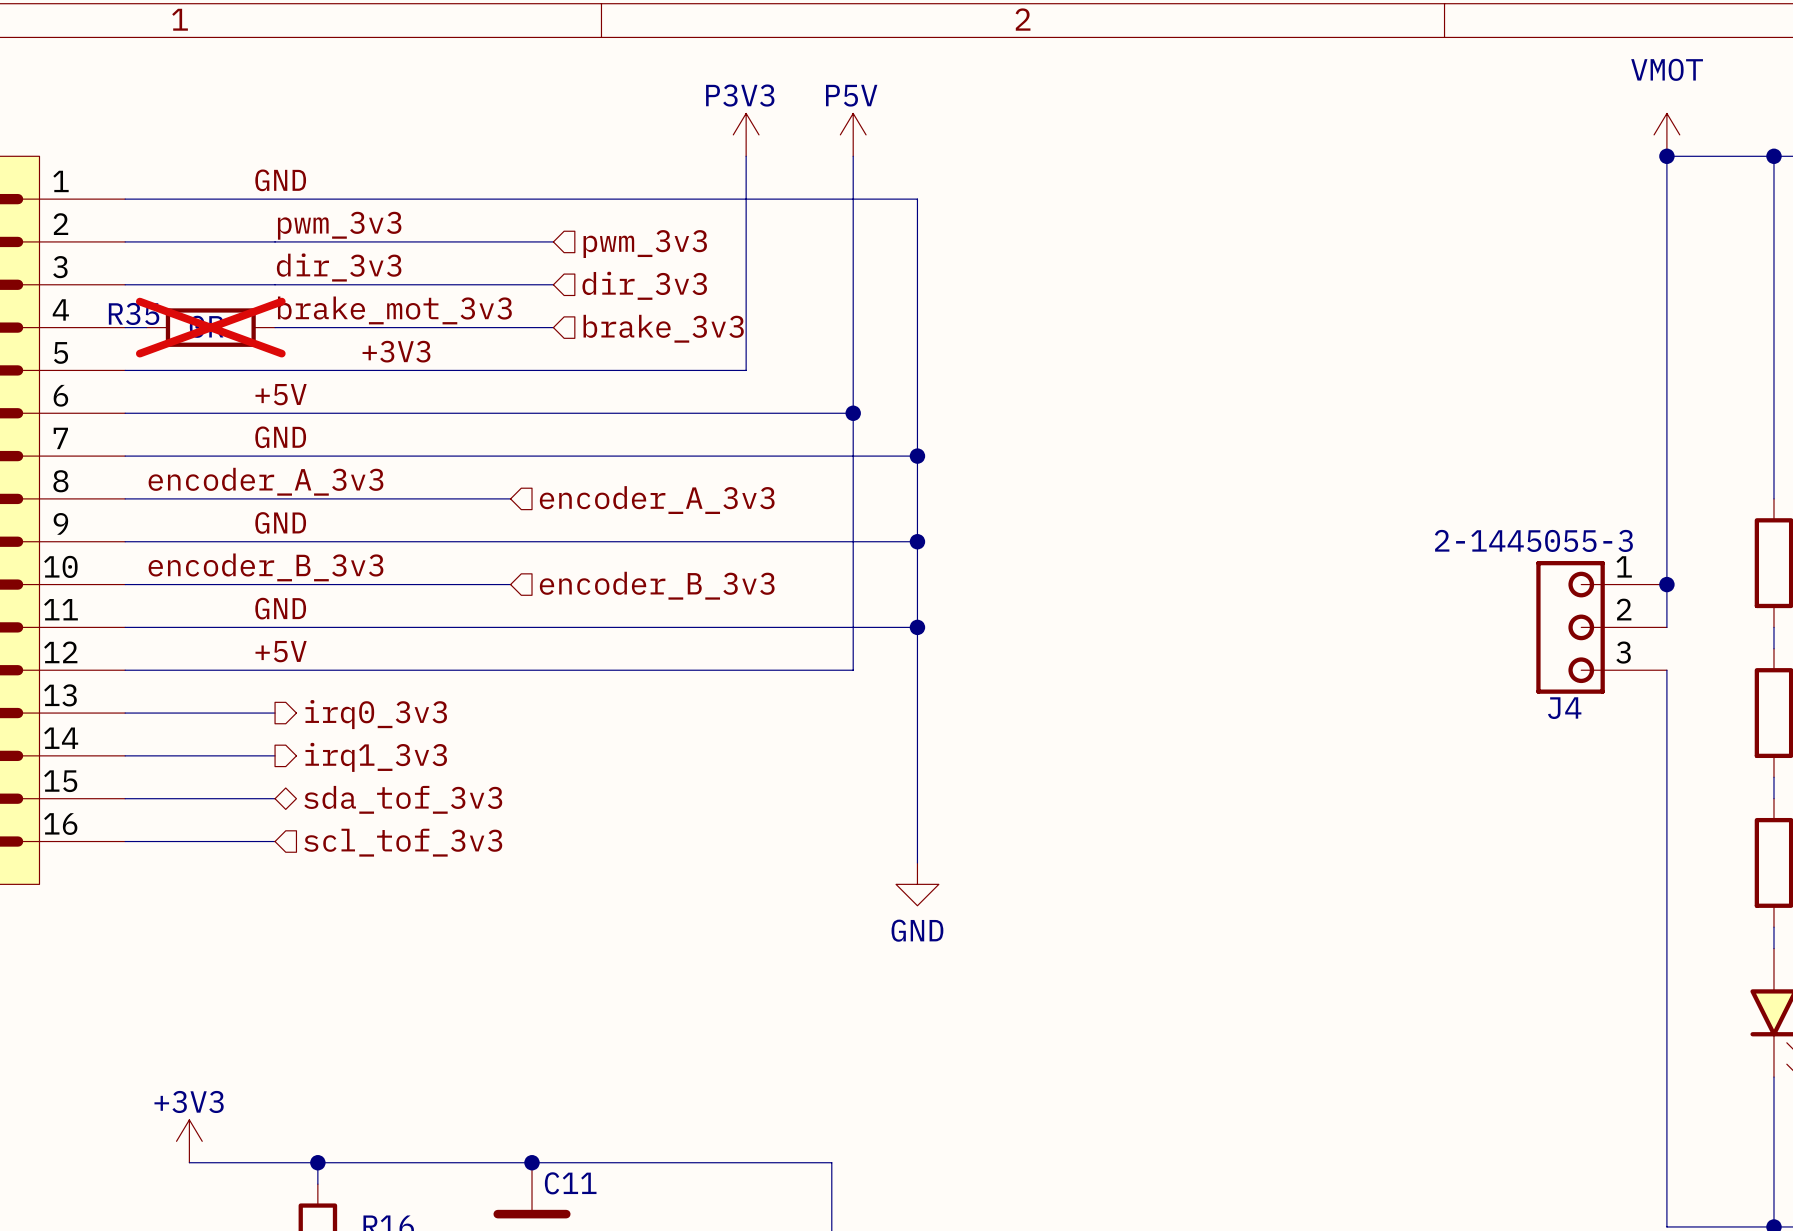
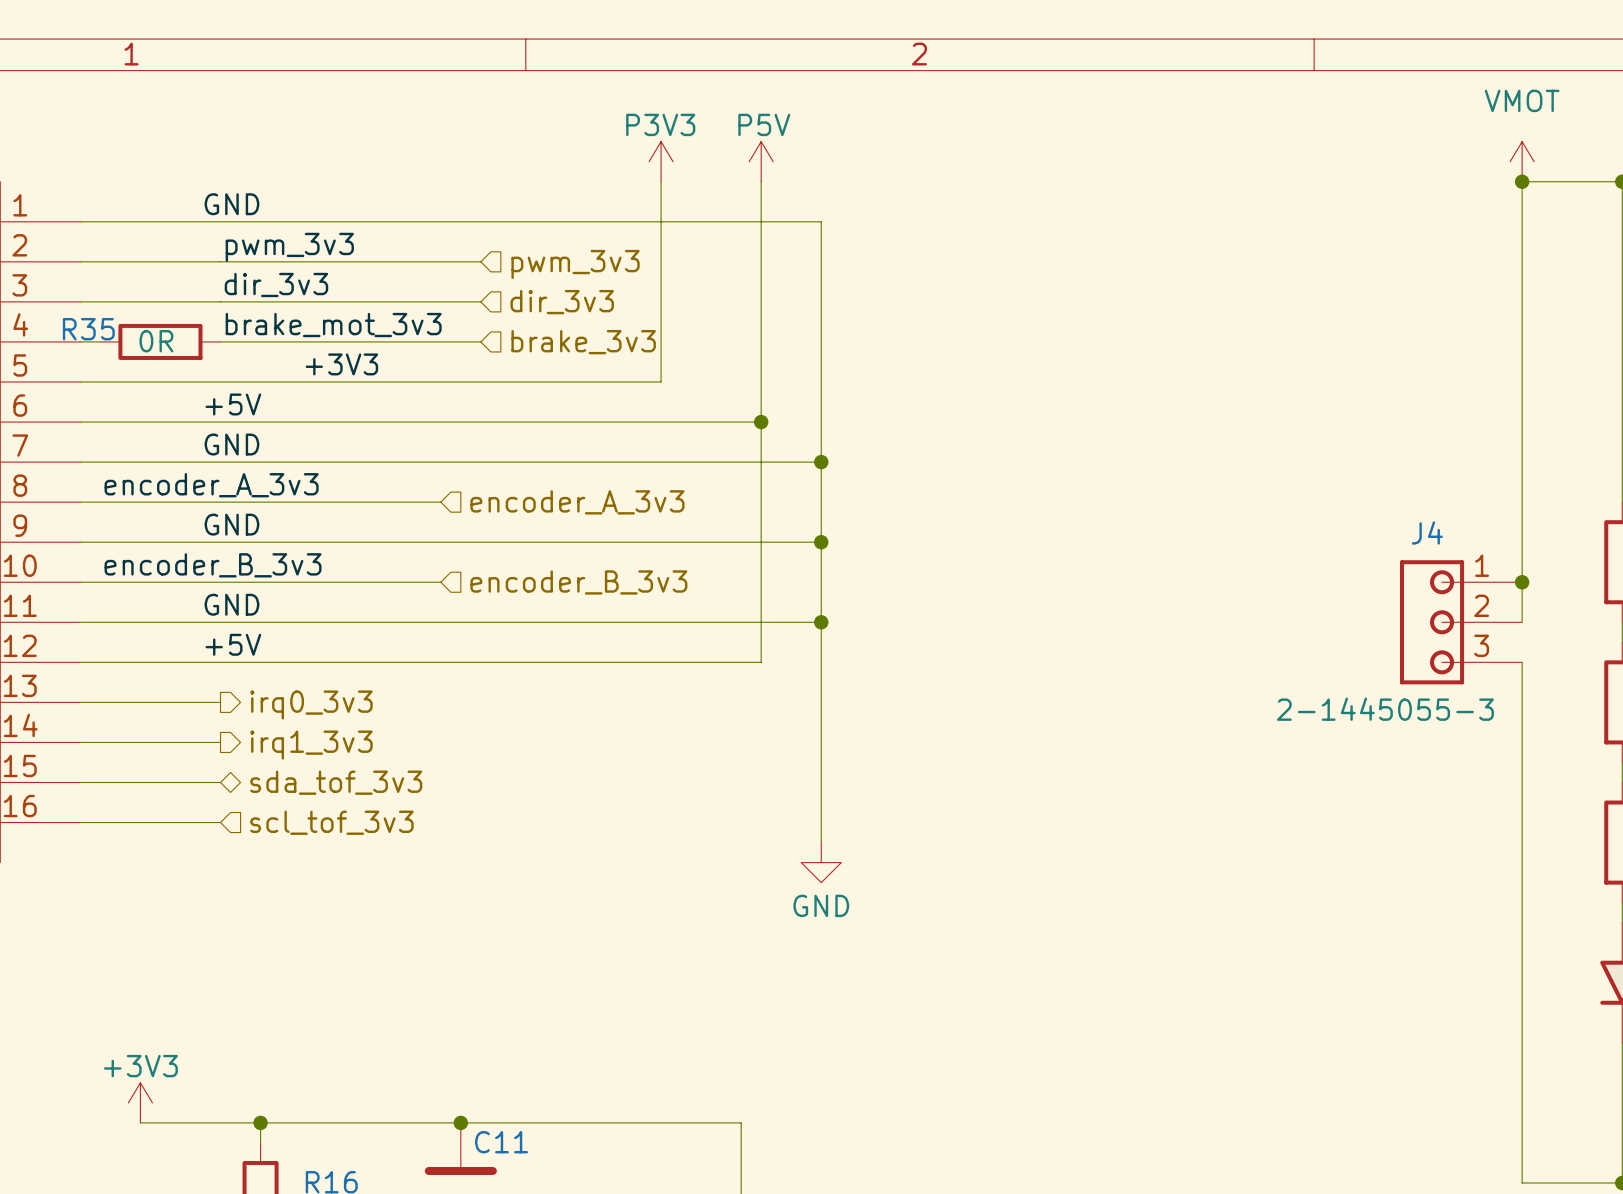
R35 do-not-place cross: (210, 327) -> none
J4 value position: 2-1445055-3 (1533, 540) -> 2-1445055-3 (1385, 709)
J4 name position: J4 (1564, 708) -> J4 (1427, 532)

